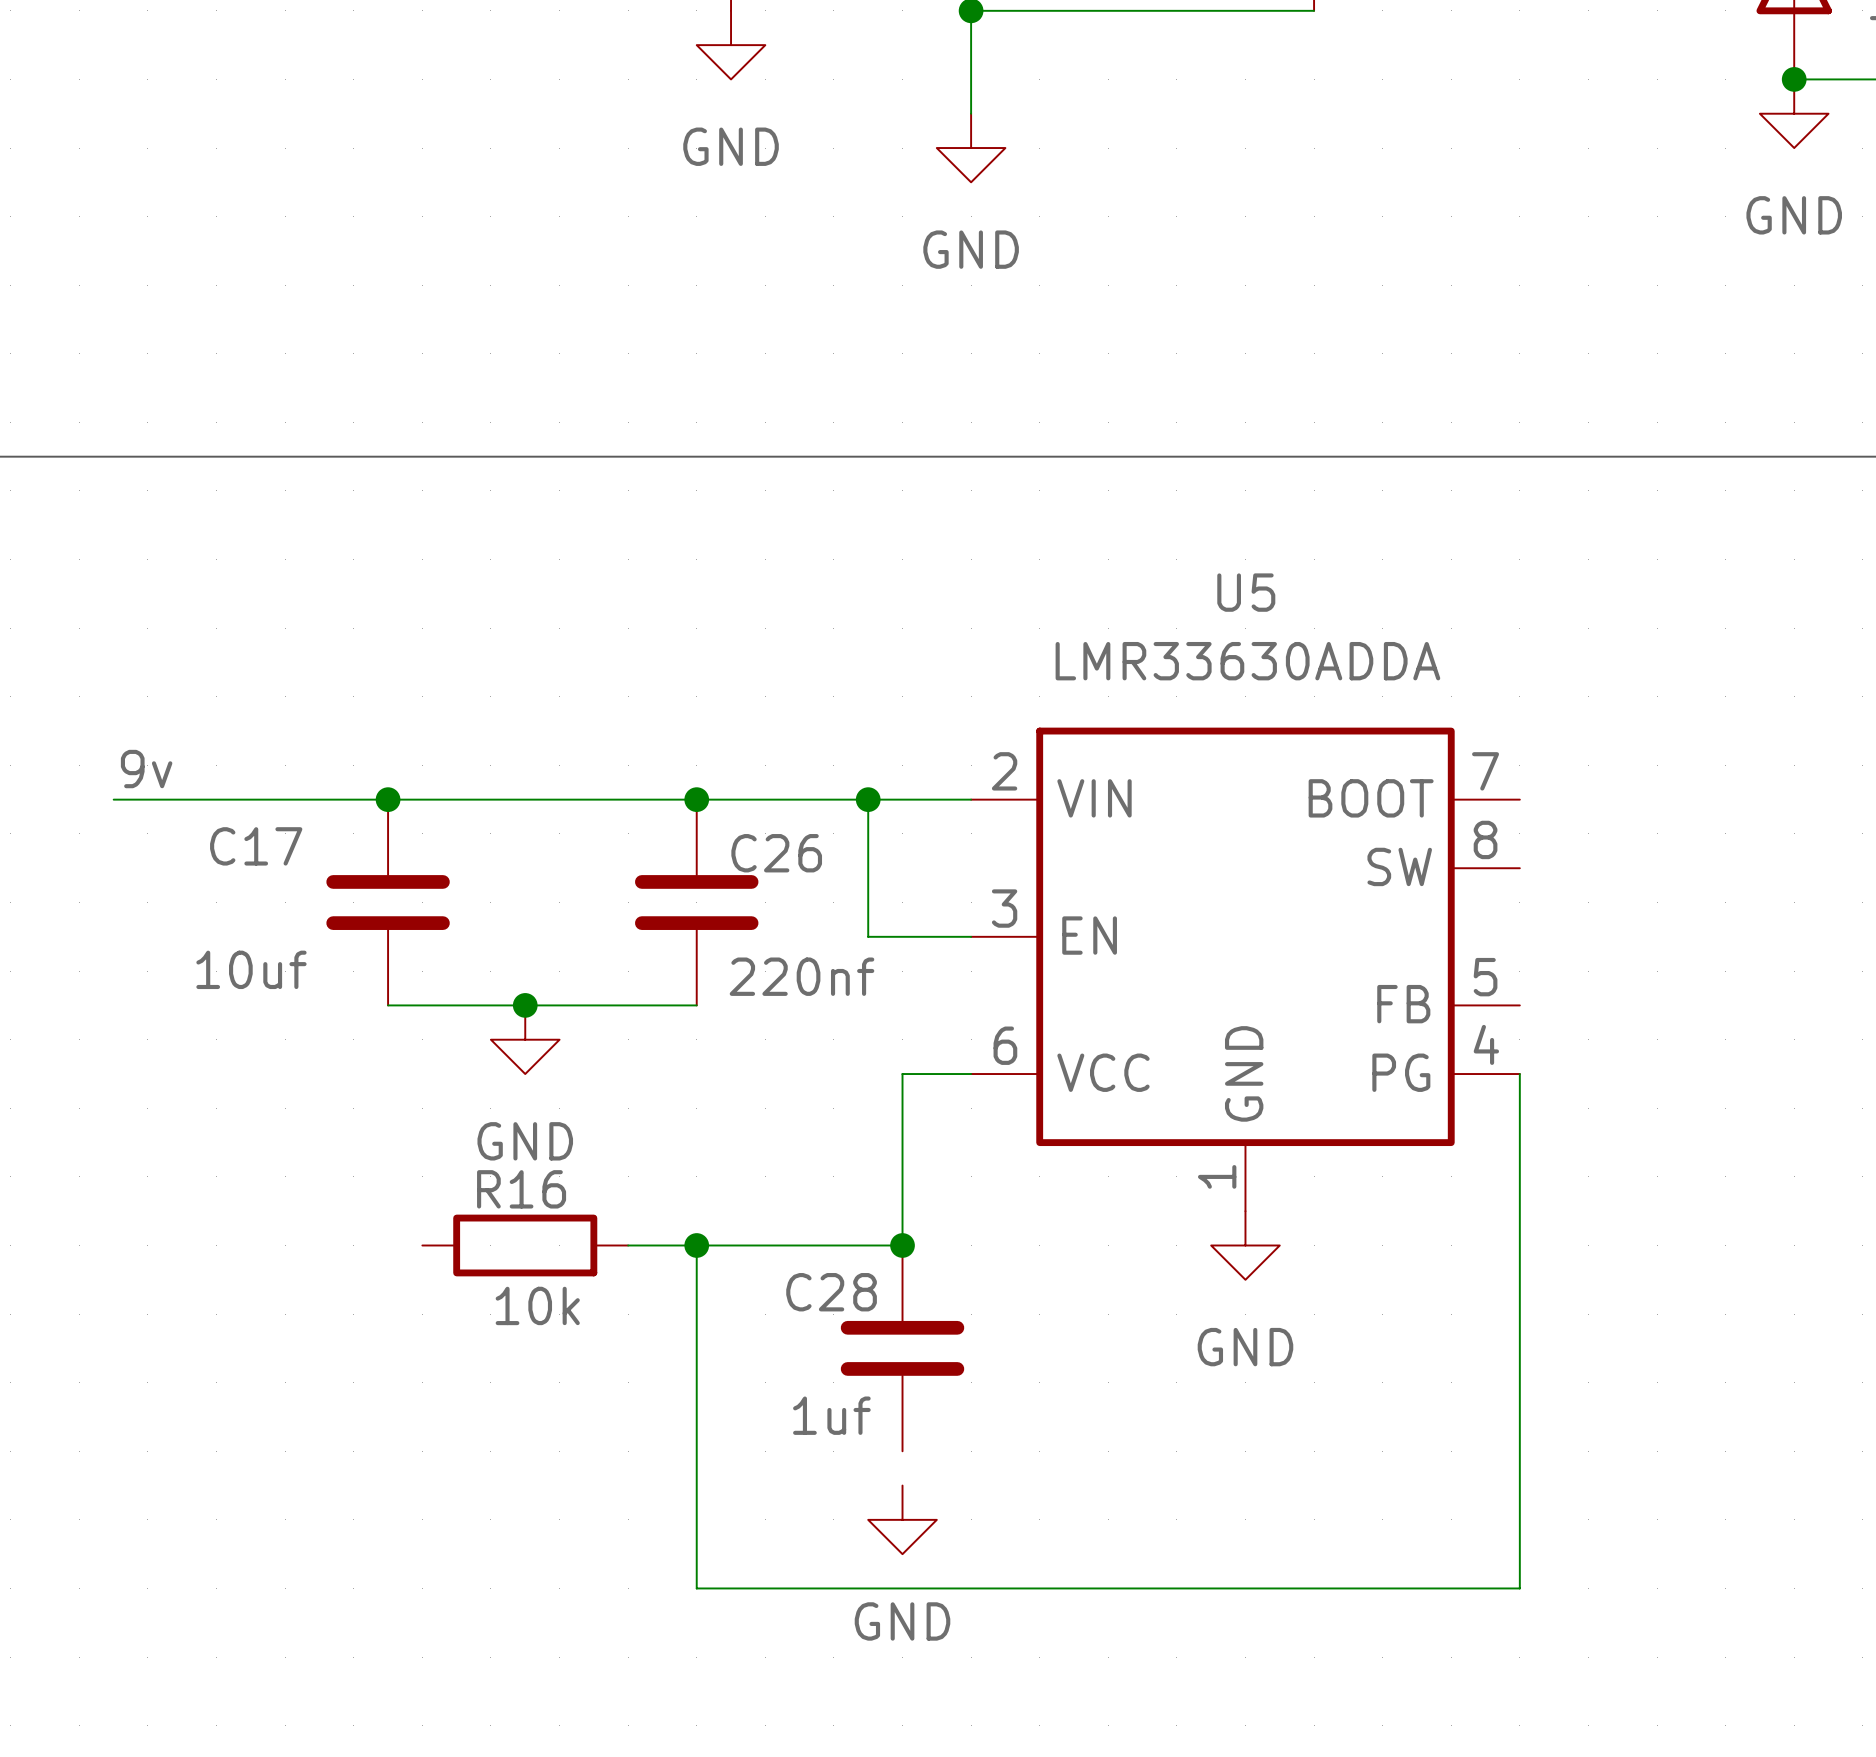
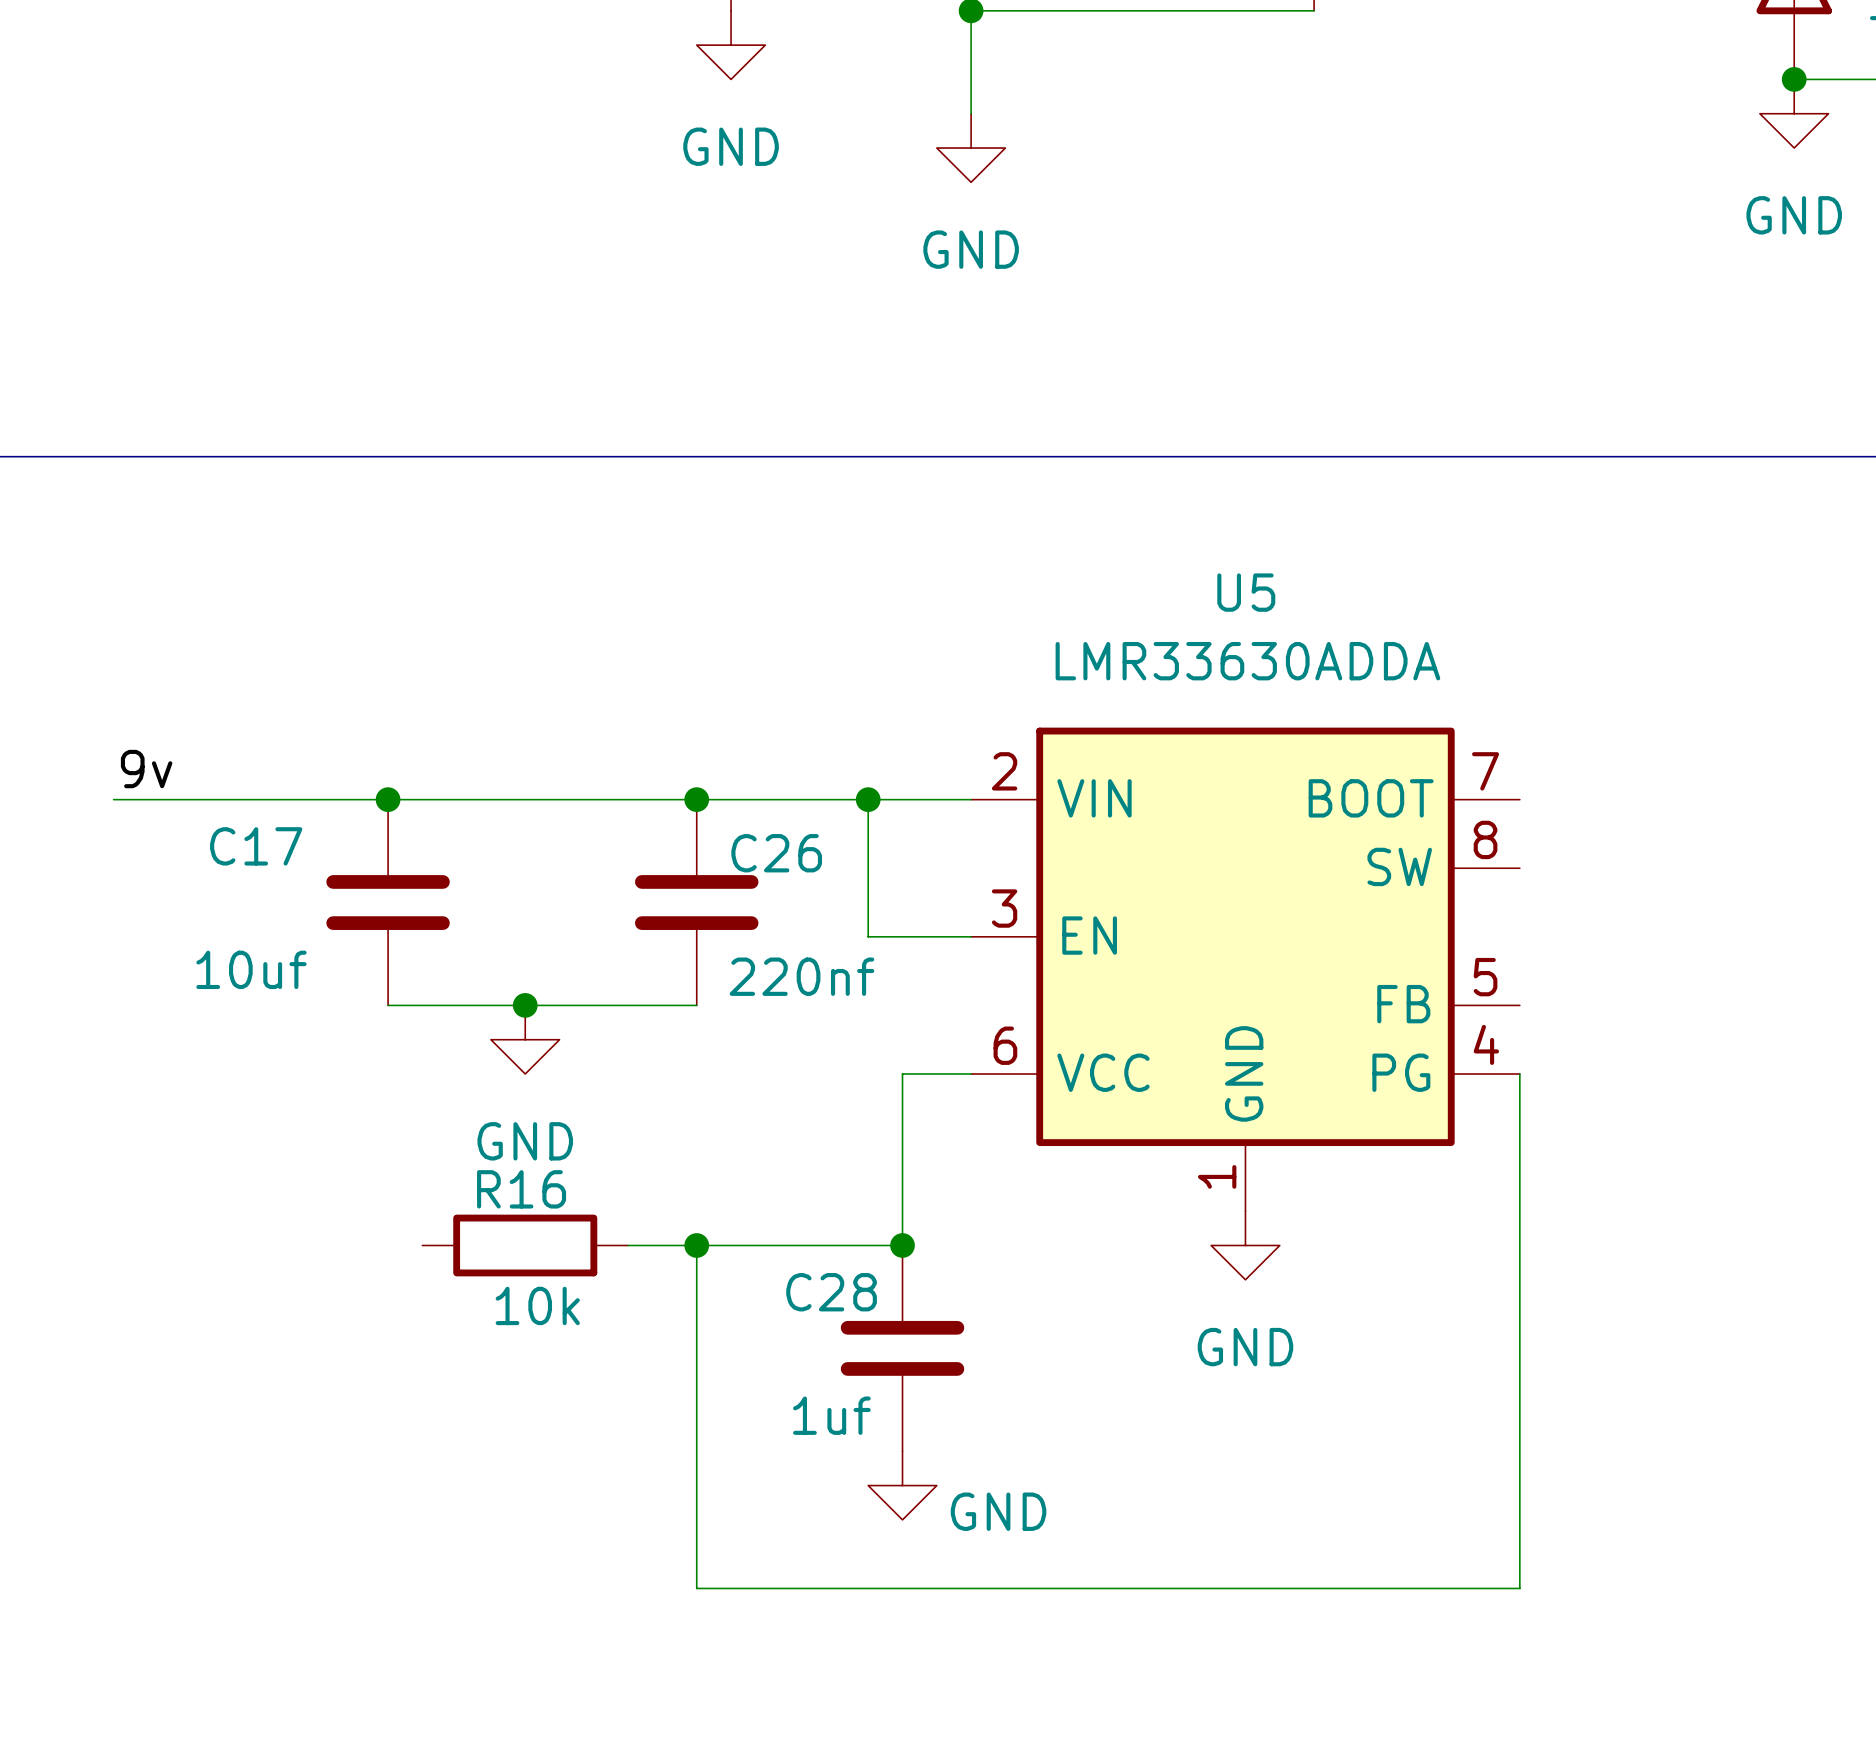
power symbol position: GND (902, 1519) -> GND (902, 1485)
power symbol text position: GND (902, 1621) -> GND (998, 1511)

